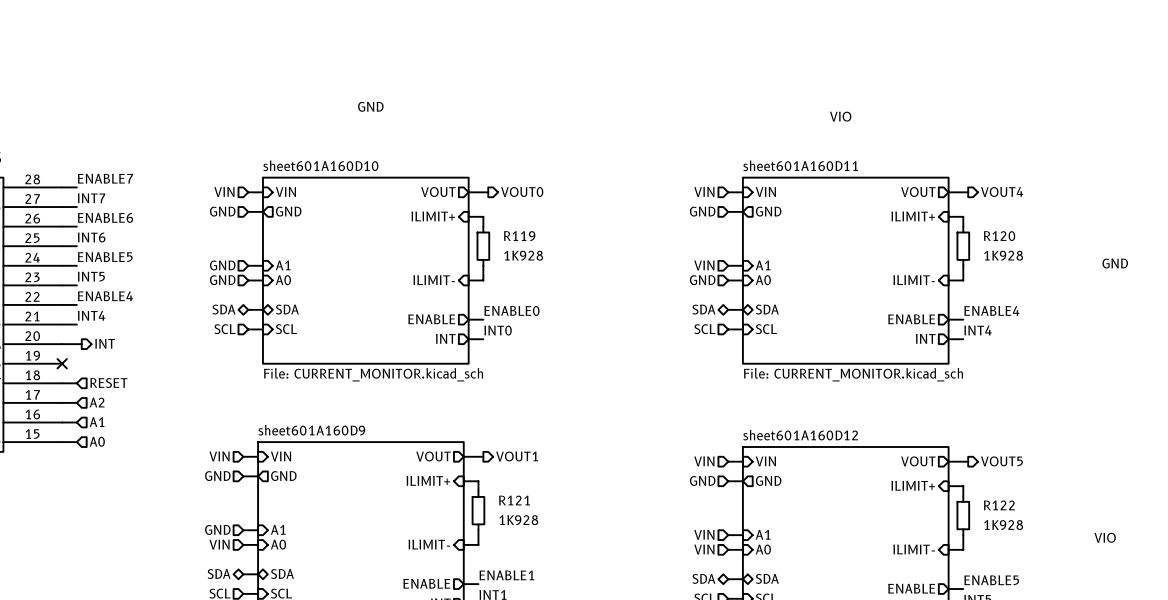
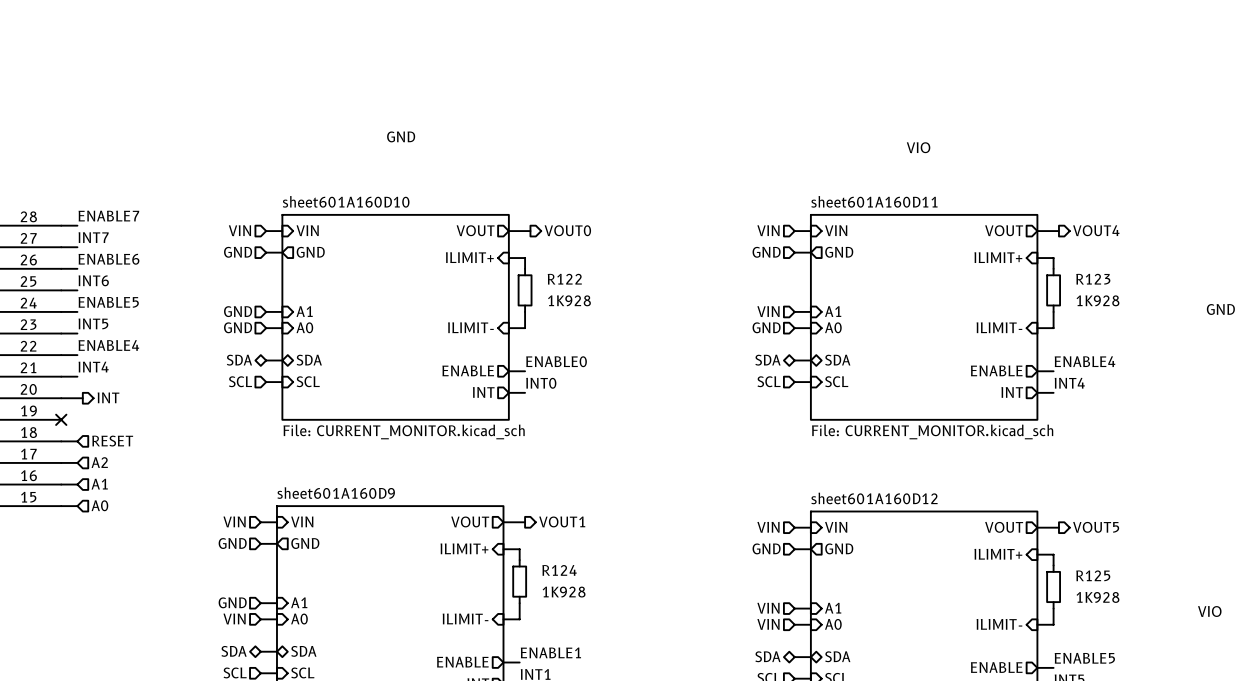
R119 name: R119 (519, 236) -> R122 (564, 279)
R120 name: R120 (999, 236) -> R123 (1093, 279)
R121 name: R121 (514, 500) -> R124 (559, 570)
R122 name: R122 (999, 505) -> R125 (1093, 575)

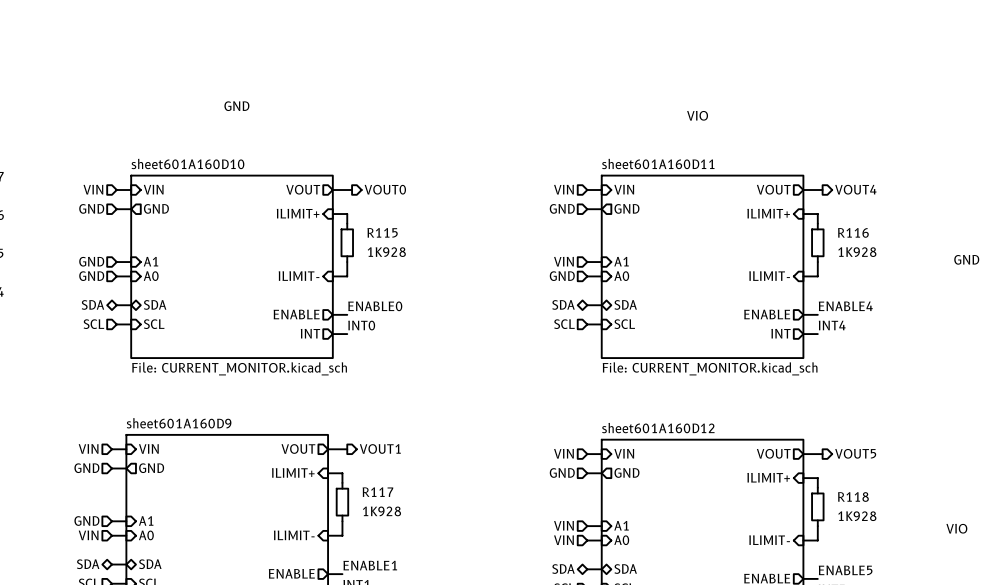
R122 name: R122 (564, 279) -> R115 (382, 232)
R123 name: R123 (1093, 279) -> R116 (853, 232)
R124 name: R124 (559, 570) -> R117 (377, 492)
R125 name: R125 (1093, 575) -> R118 (853, 497)

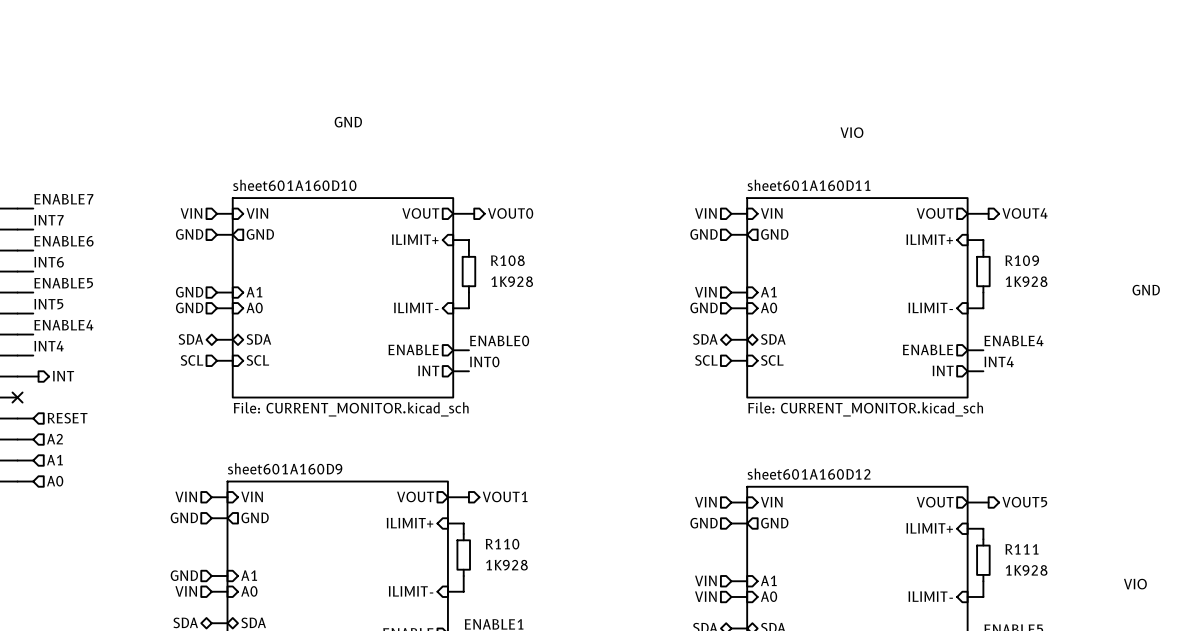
R115 name: R115 (382, 232) -> R108 (507, 260)
R116 name: R116 (853, 232) -> R109 (1022, 260)
R117 name: R117 (377, 492) -> R110 (502, 544)
R118 name: R118 (853, 497) -> R111 (1022, 549)

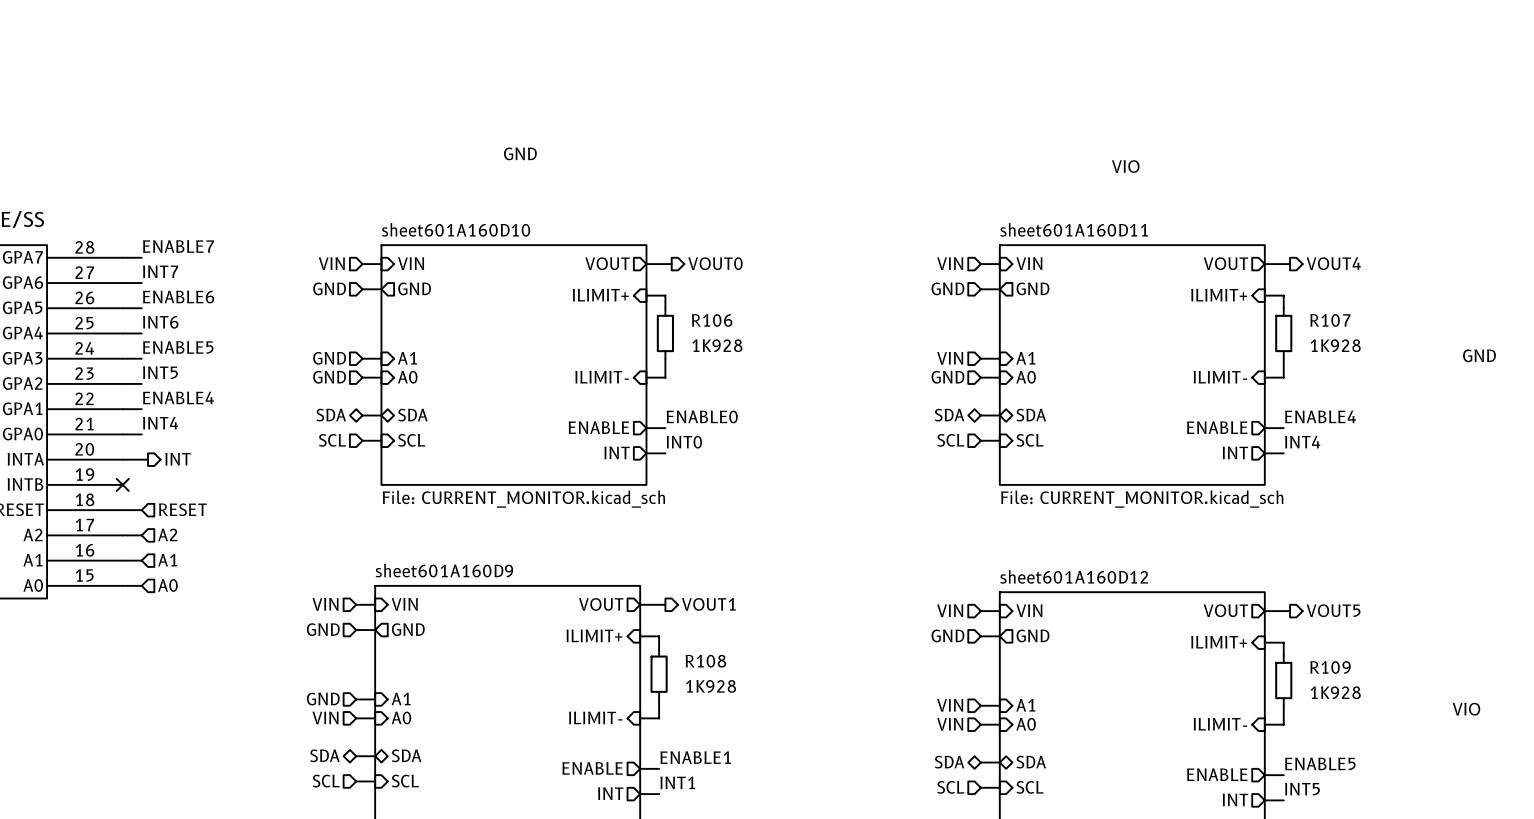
R108 name: R108 (507, 260) -> R106 (712, 320)
R109 name: R109 (1022, 260) -> R107 (1330, 320)
R110 name: R110 (502, 544) -> R108 (705, 661)
R111 name: R111 (1022, 549) -> R109 (1330, 667)

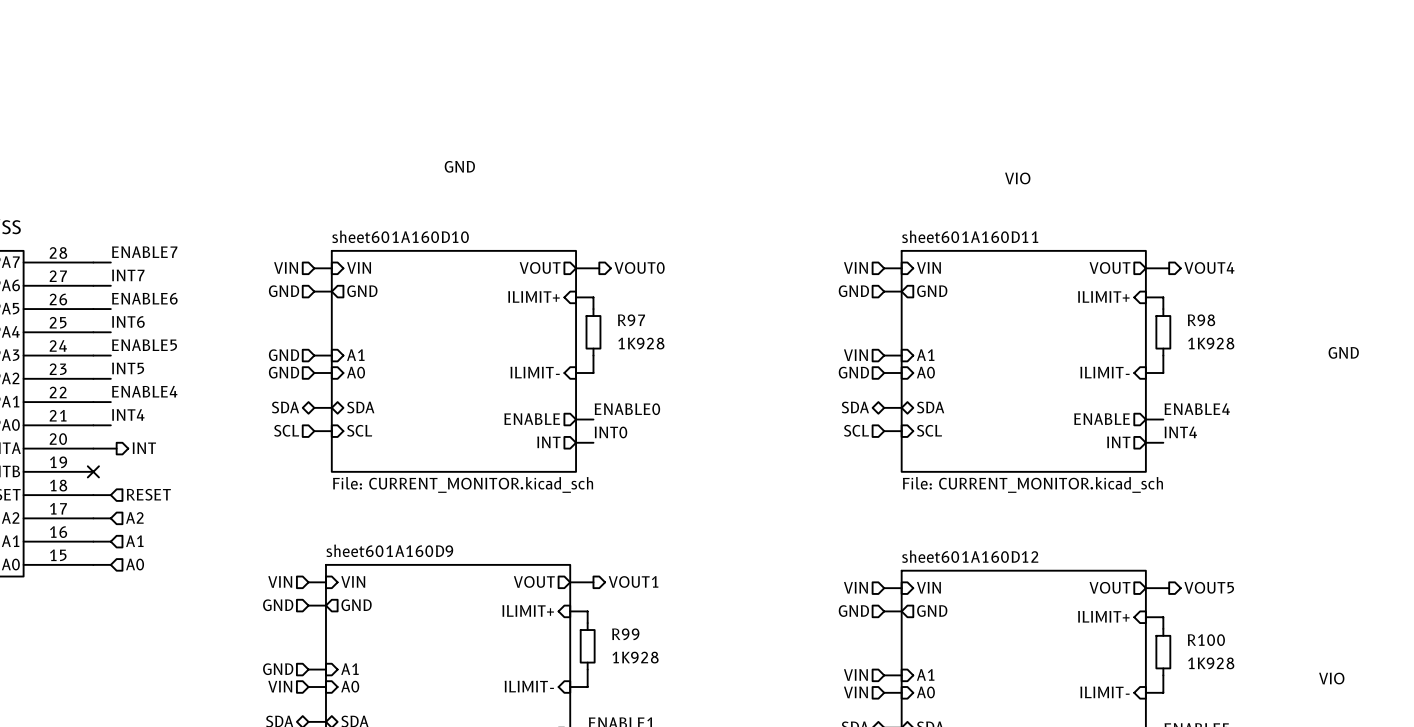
R106 name: R106 (712, 320) -> R97 (631, 320)
R107 name: R107 (1330, 320) -> R98 (1201, 320)
R108 name: R108 (705, 661) -> R99 (625, 634)
R109 name: R109 (1330, 667) -> R100 (1206, 640)

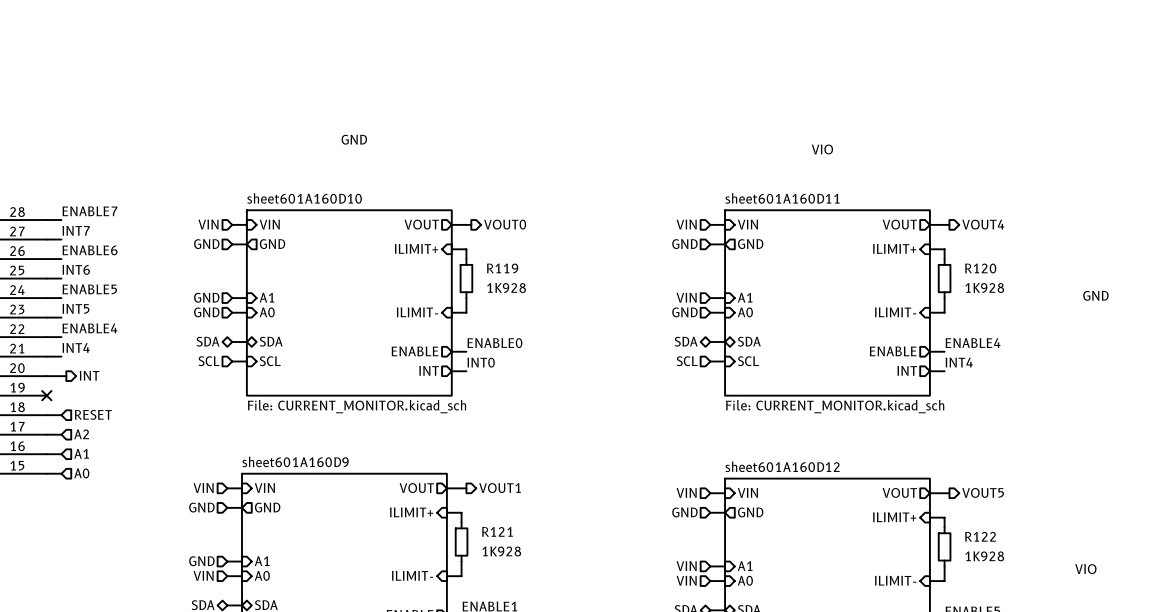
R97 name: R97 (631, 320) -> R119 (502, 268)
R98 name: R98 (1201, 320) -> R120 (980, 268)
R99 name: R99 (625, 634) -> R121 (497, 531)
R100 name: R100 (1206, 640) -> R122 (980, 536)

